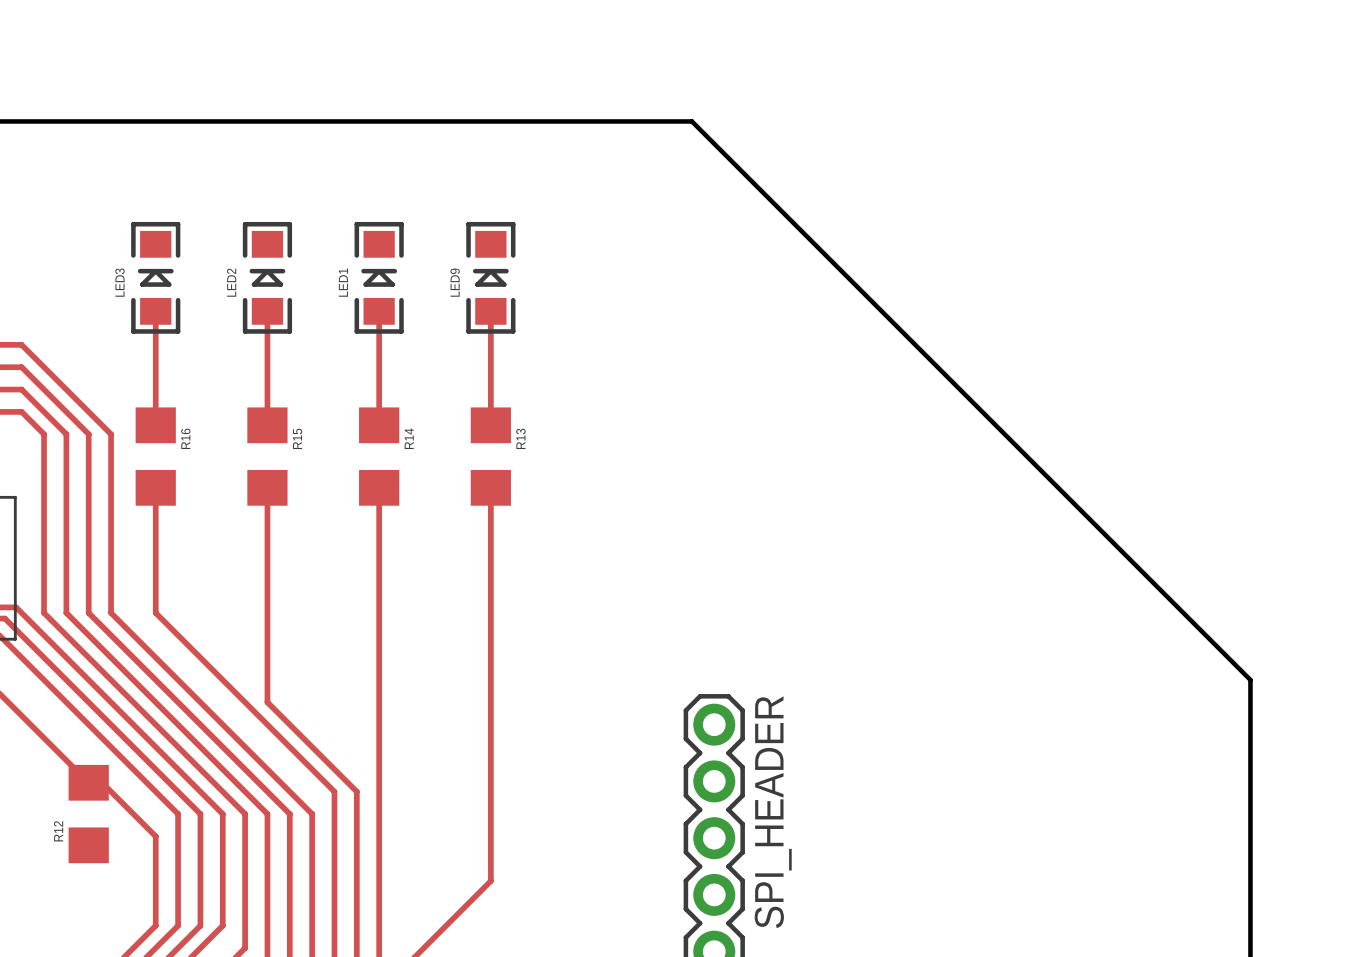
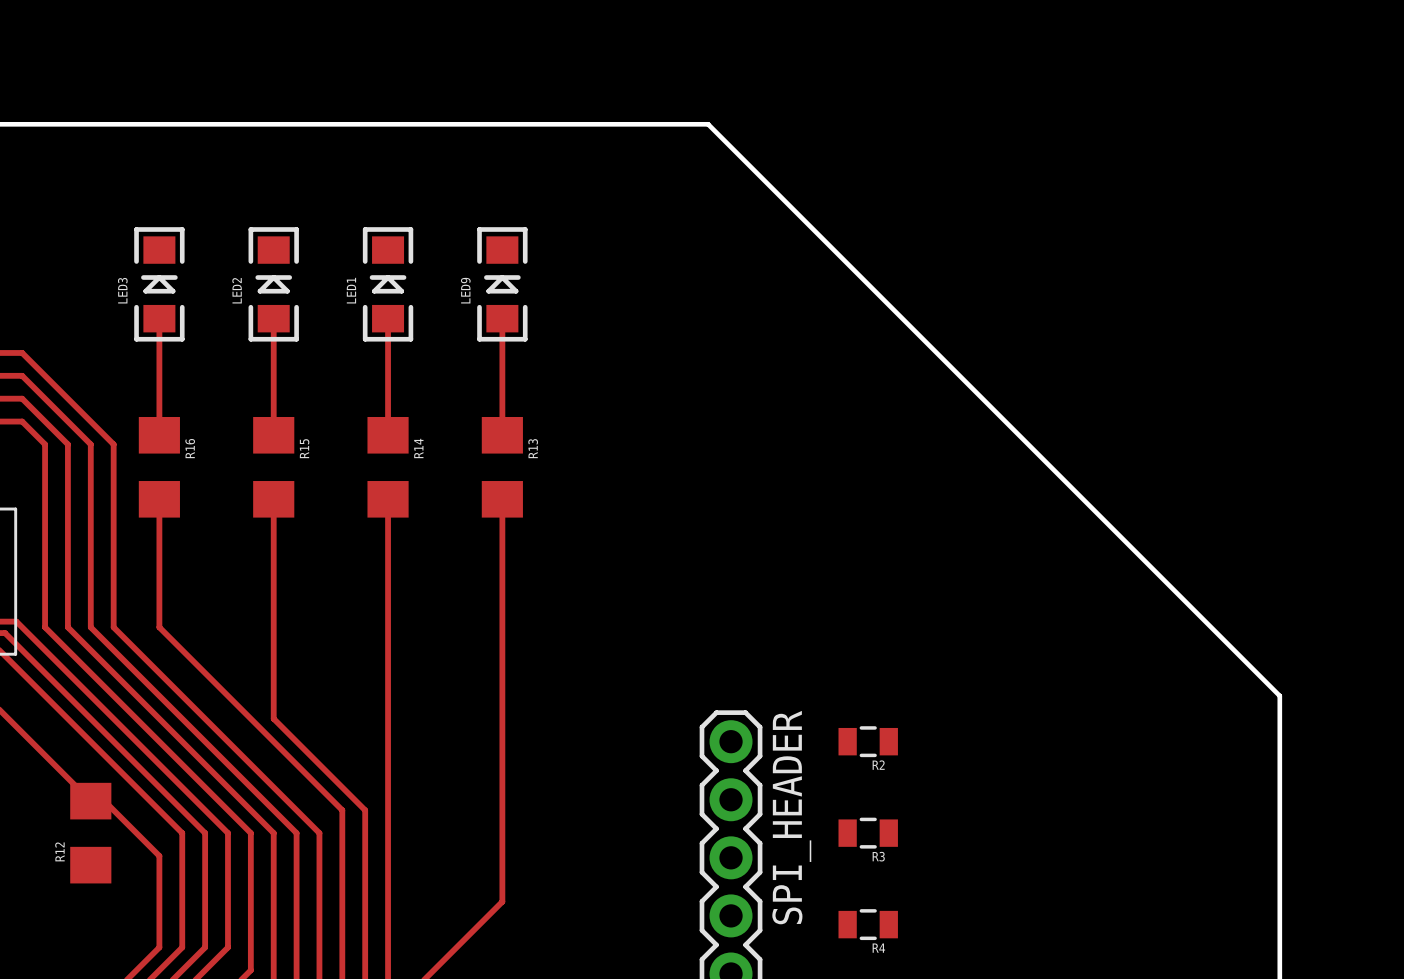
R2: none -> (868, 741)
R3: none -> (868, 833)
R4: none -> (868, 924)

